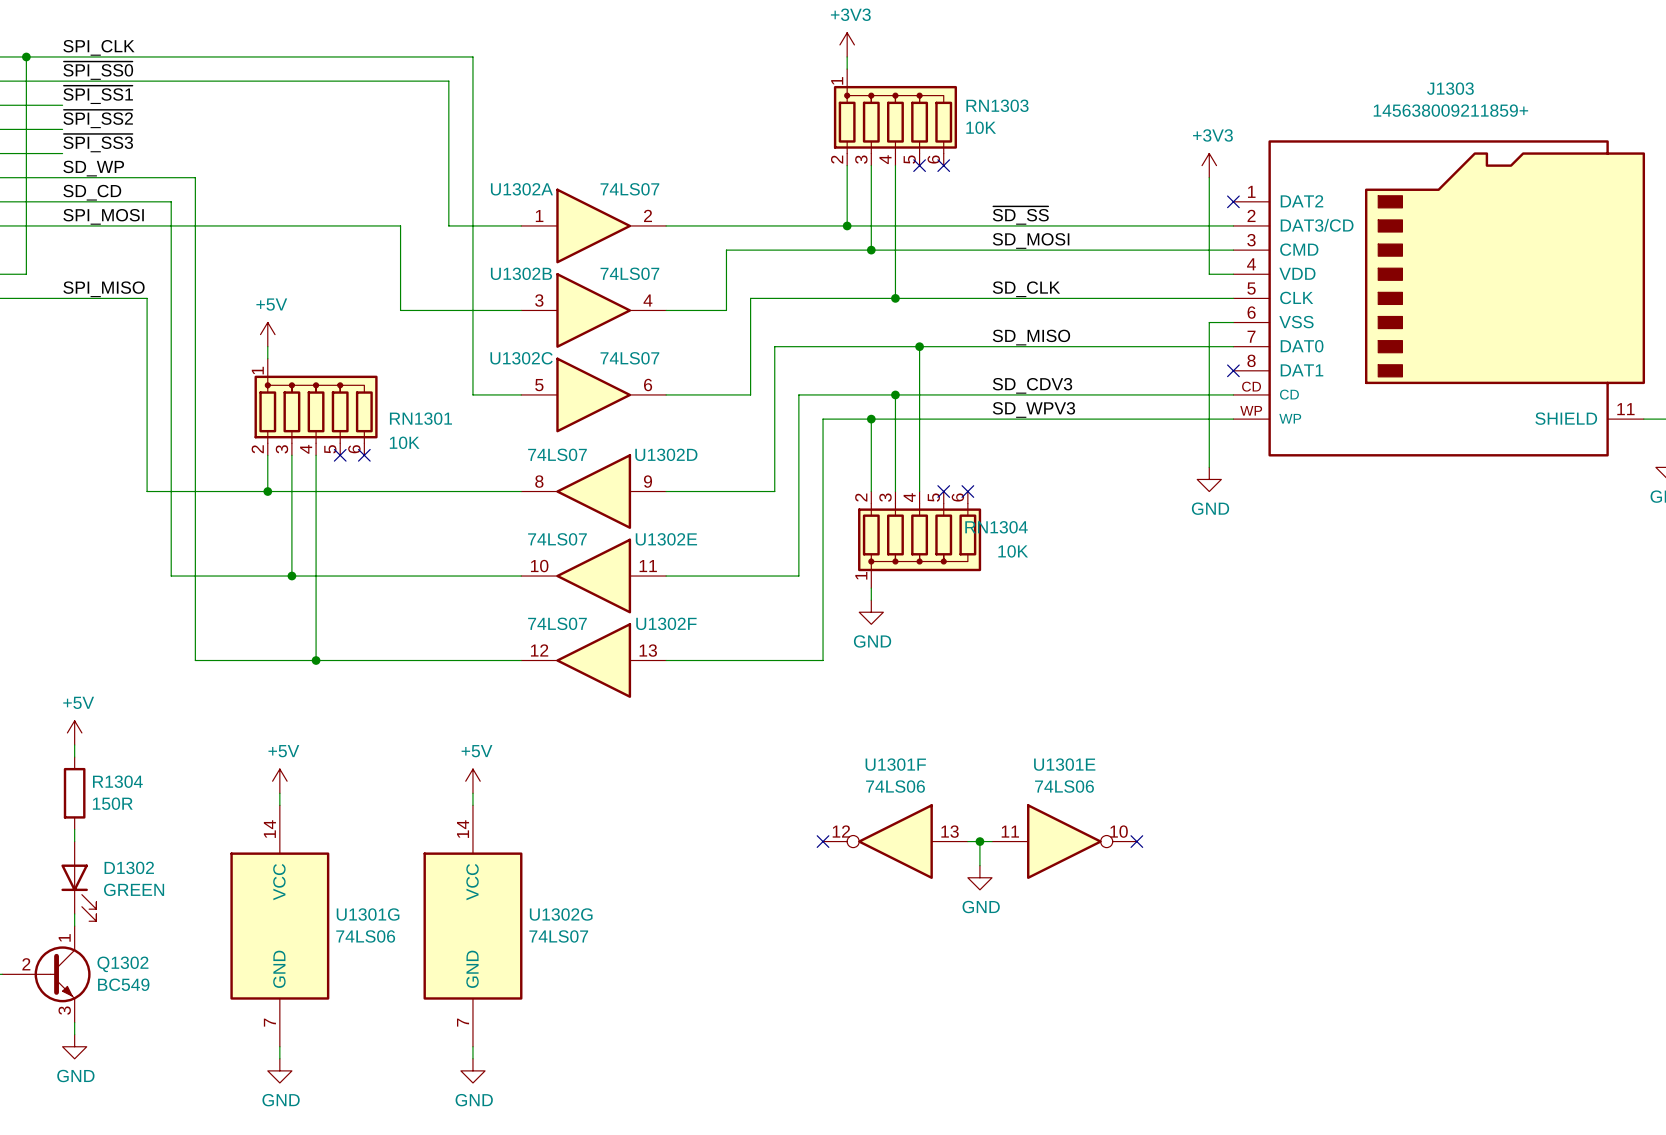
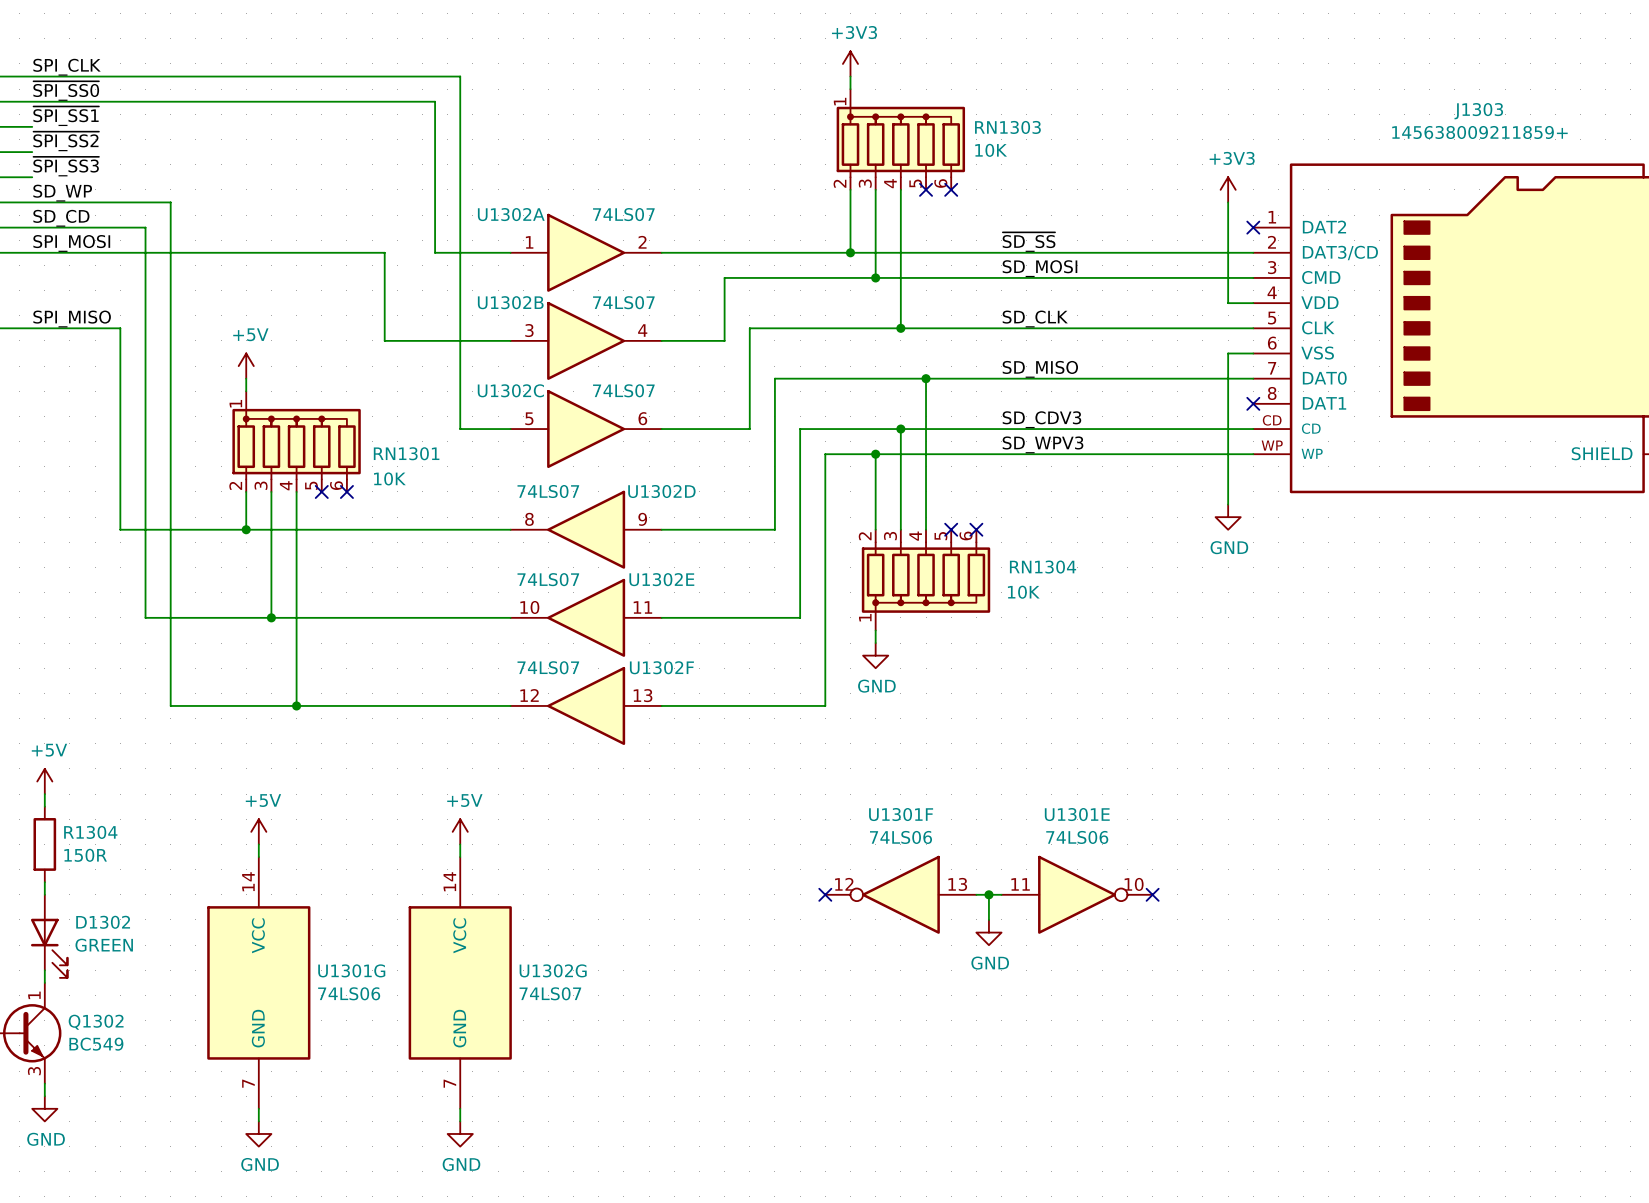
RN1304 name position: RN1304 (996, 527) -> RN1304 (1043, 567)

